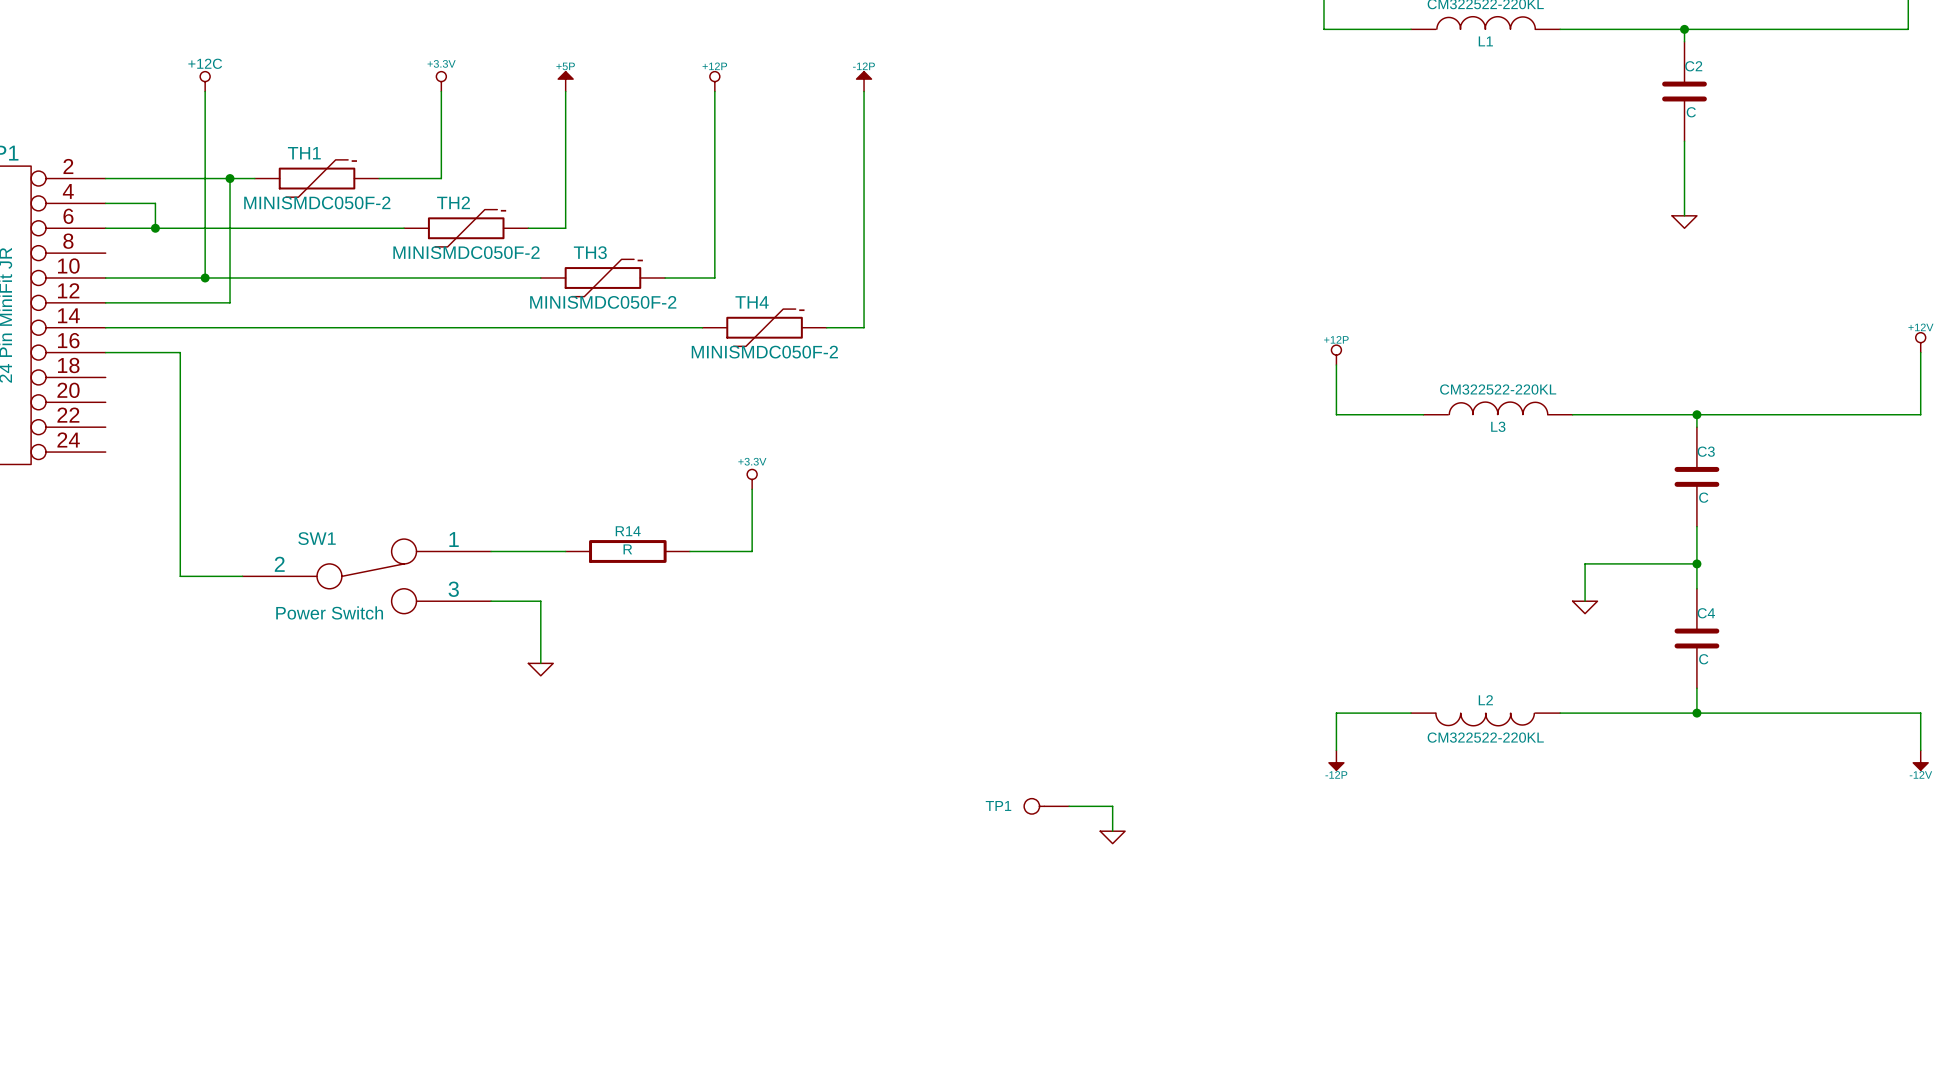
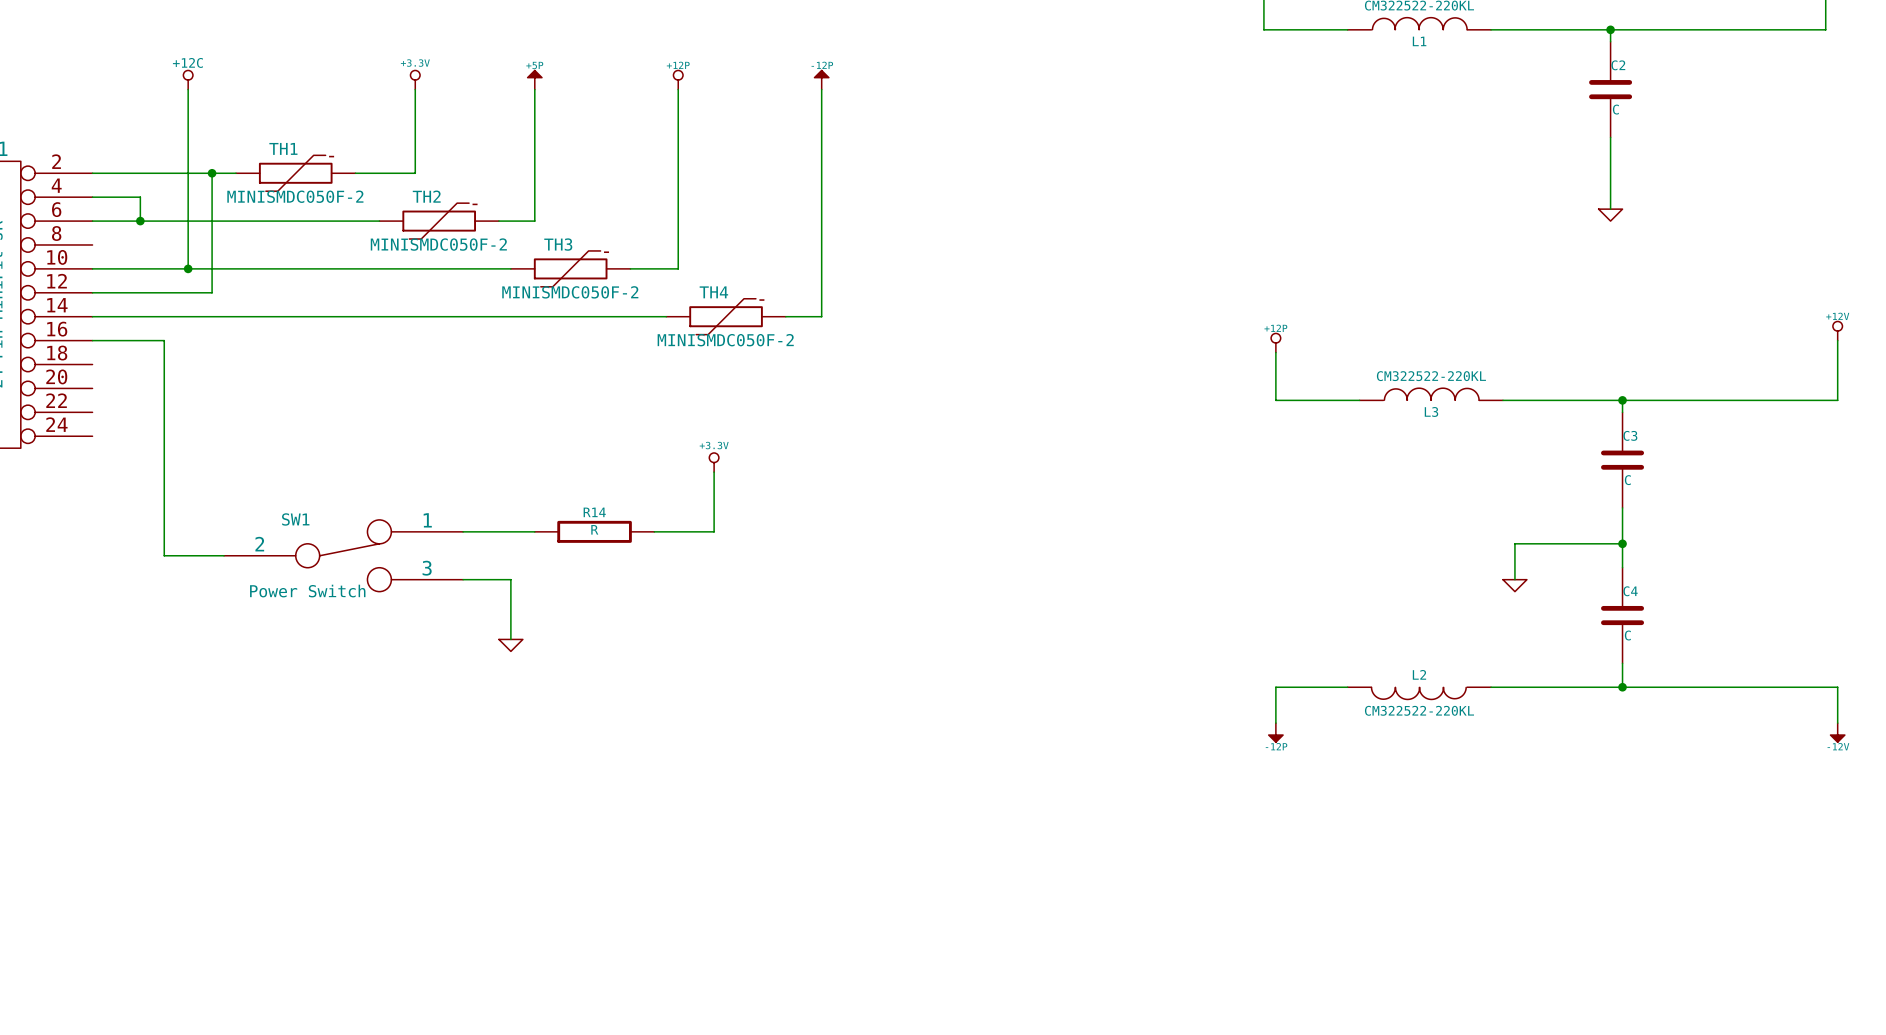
TP1: (1046, 806) -> none
wire: (1069, 806) (1112, 806) (1112, 831) -> none
power symbol: (1112, 837) -> none

